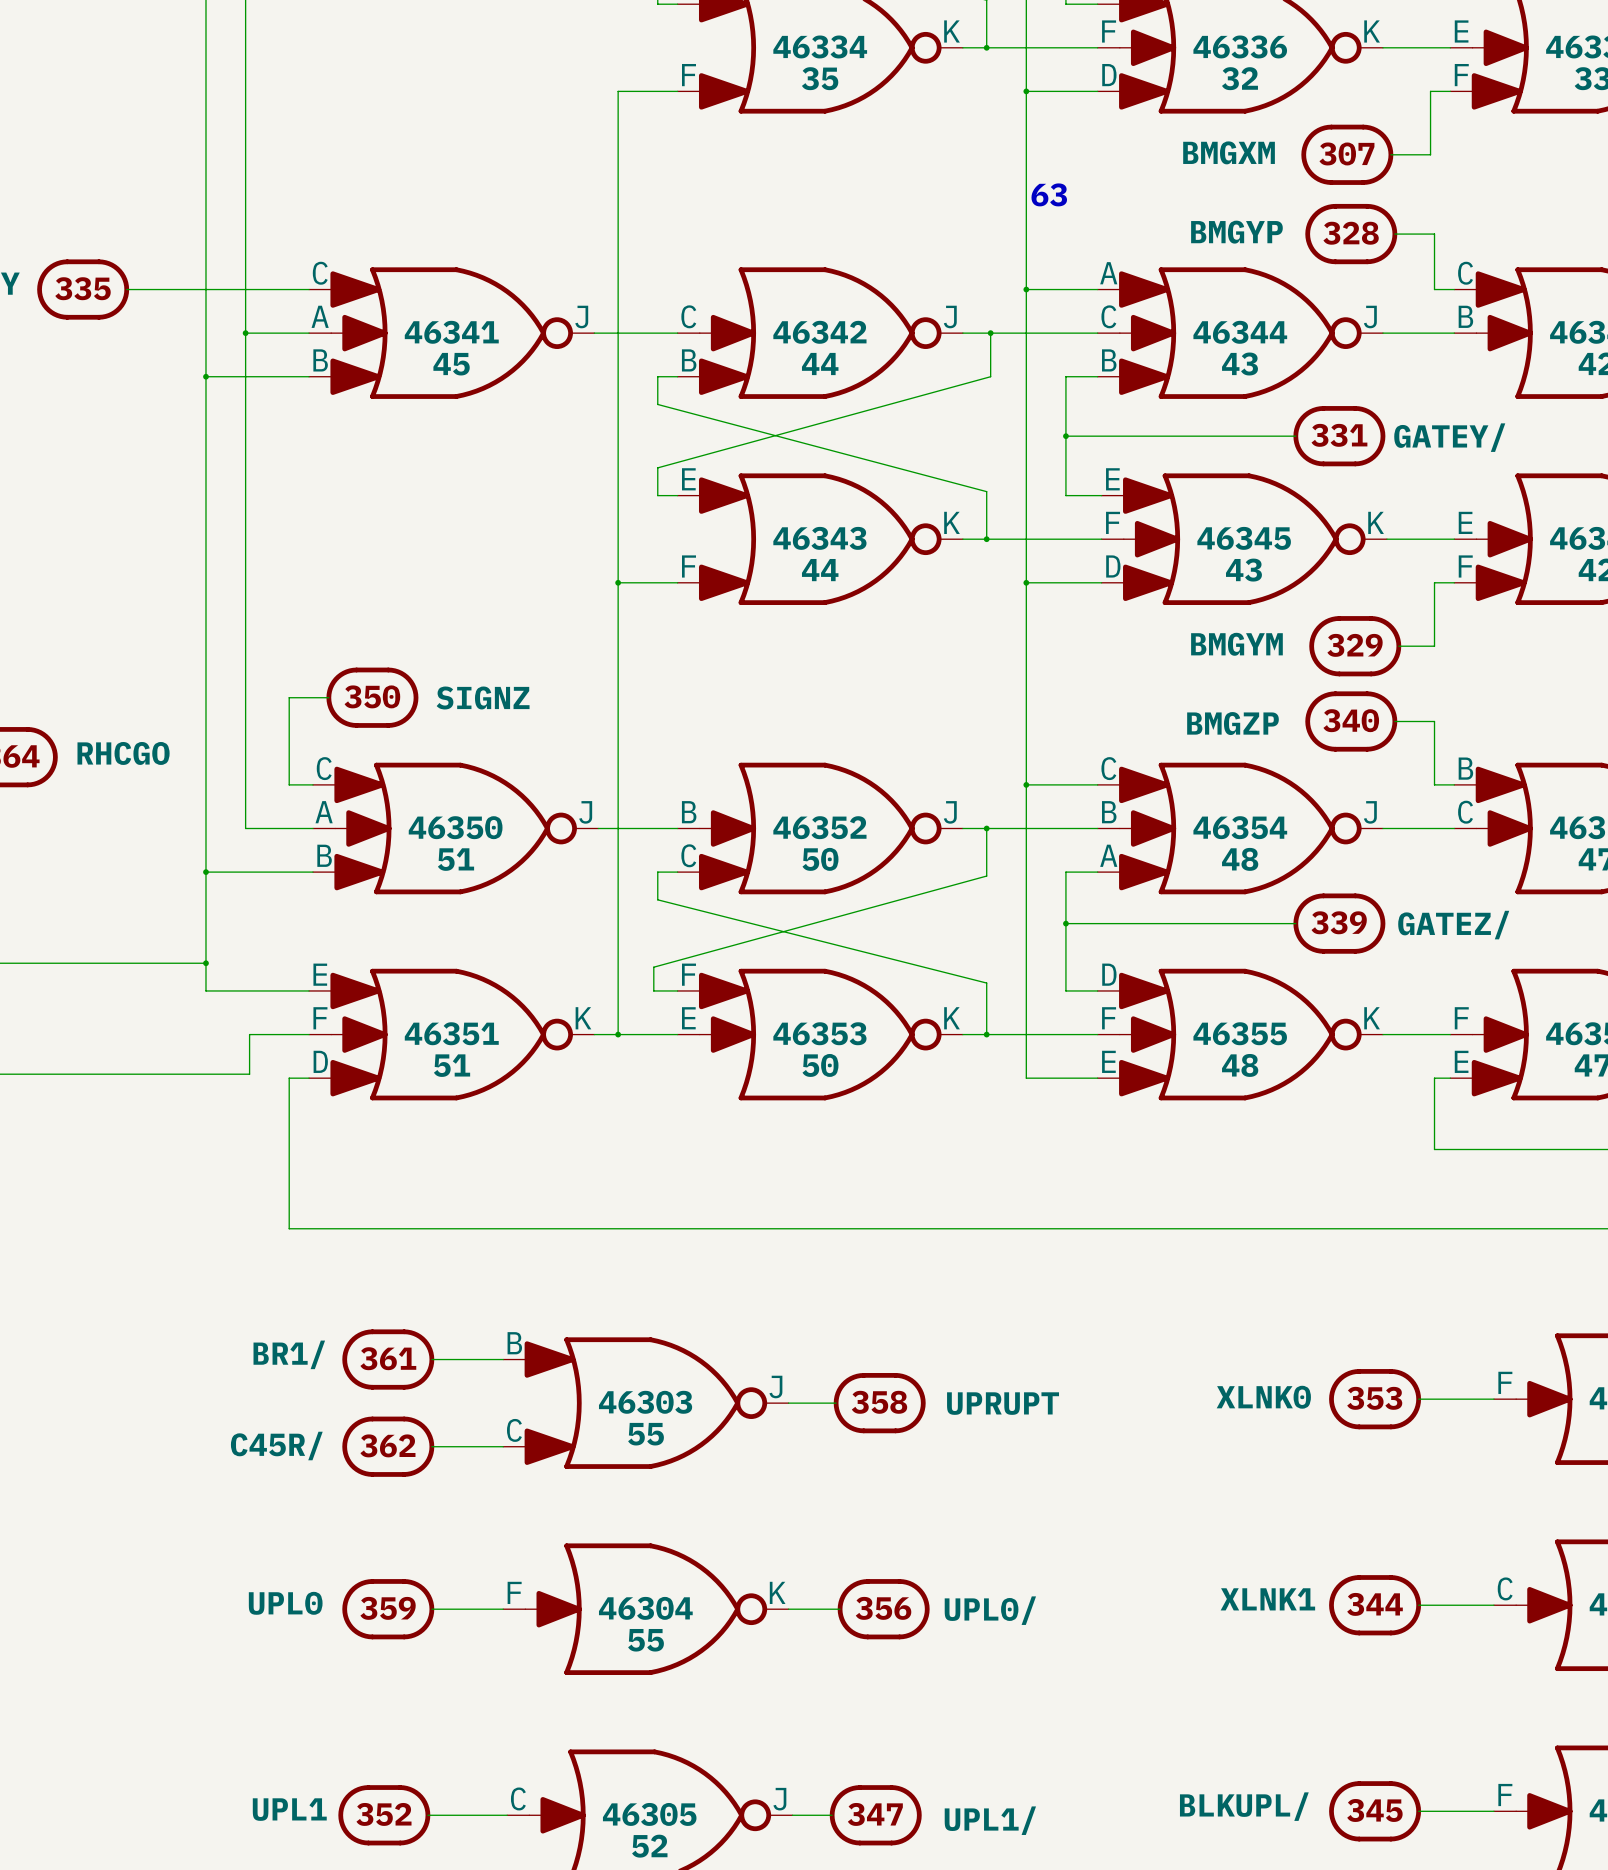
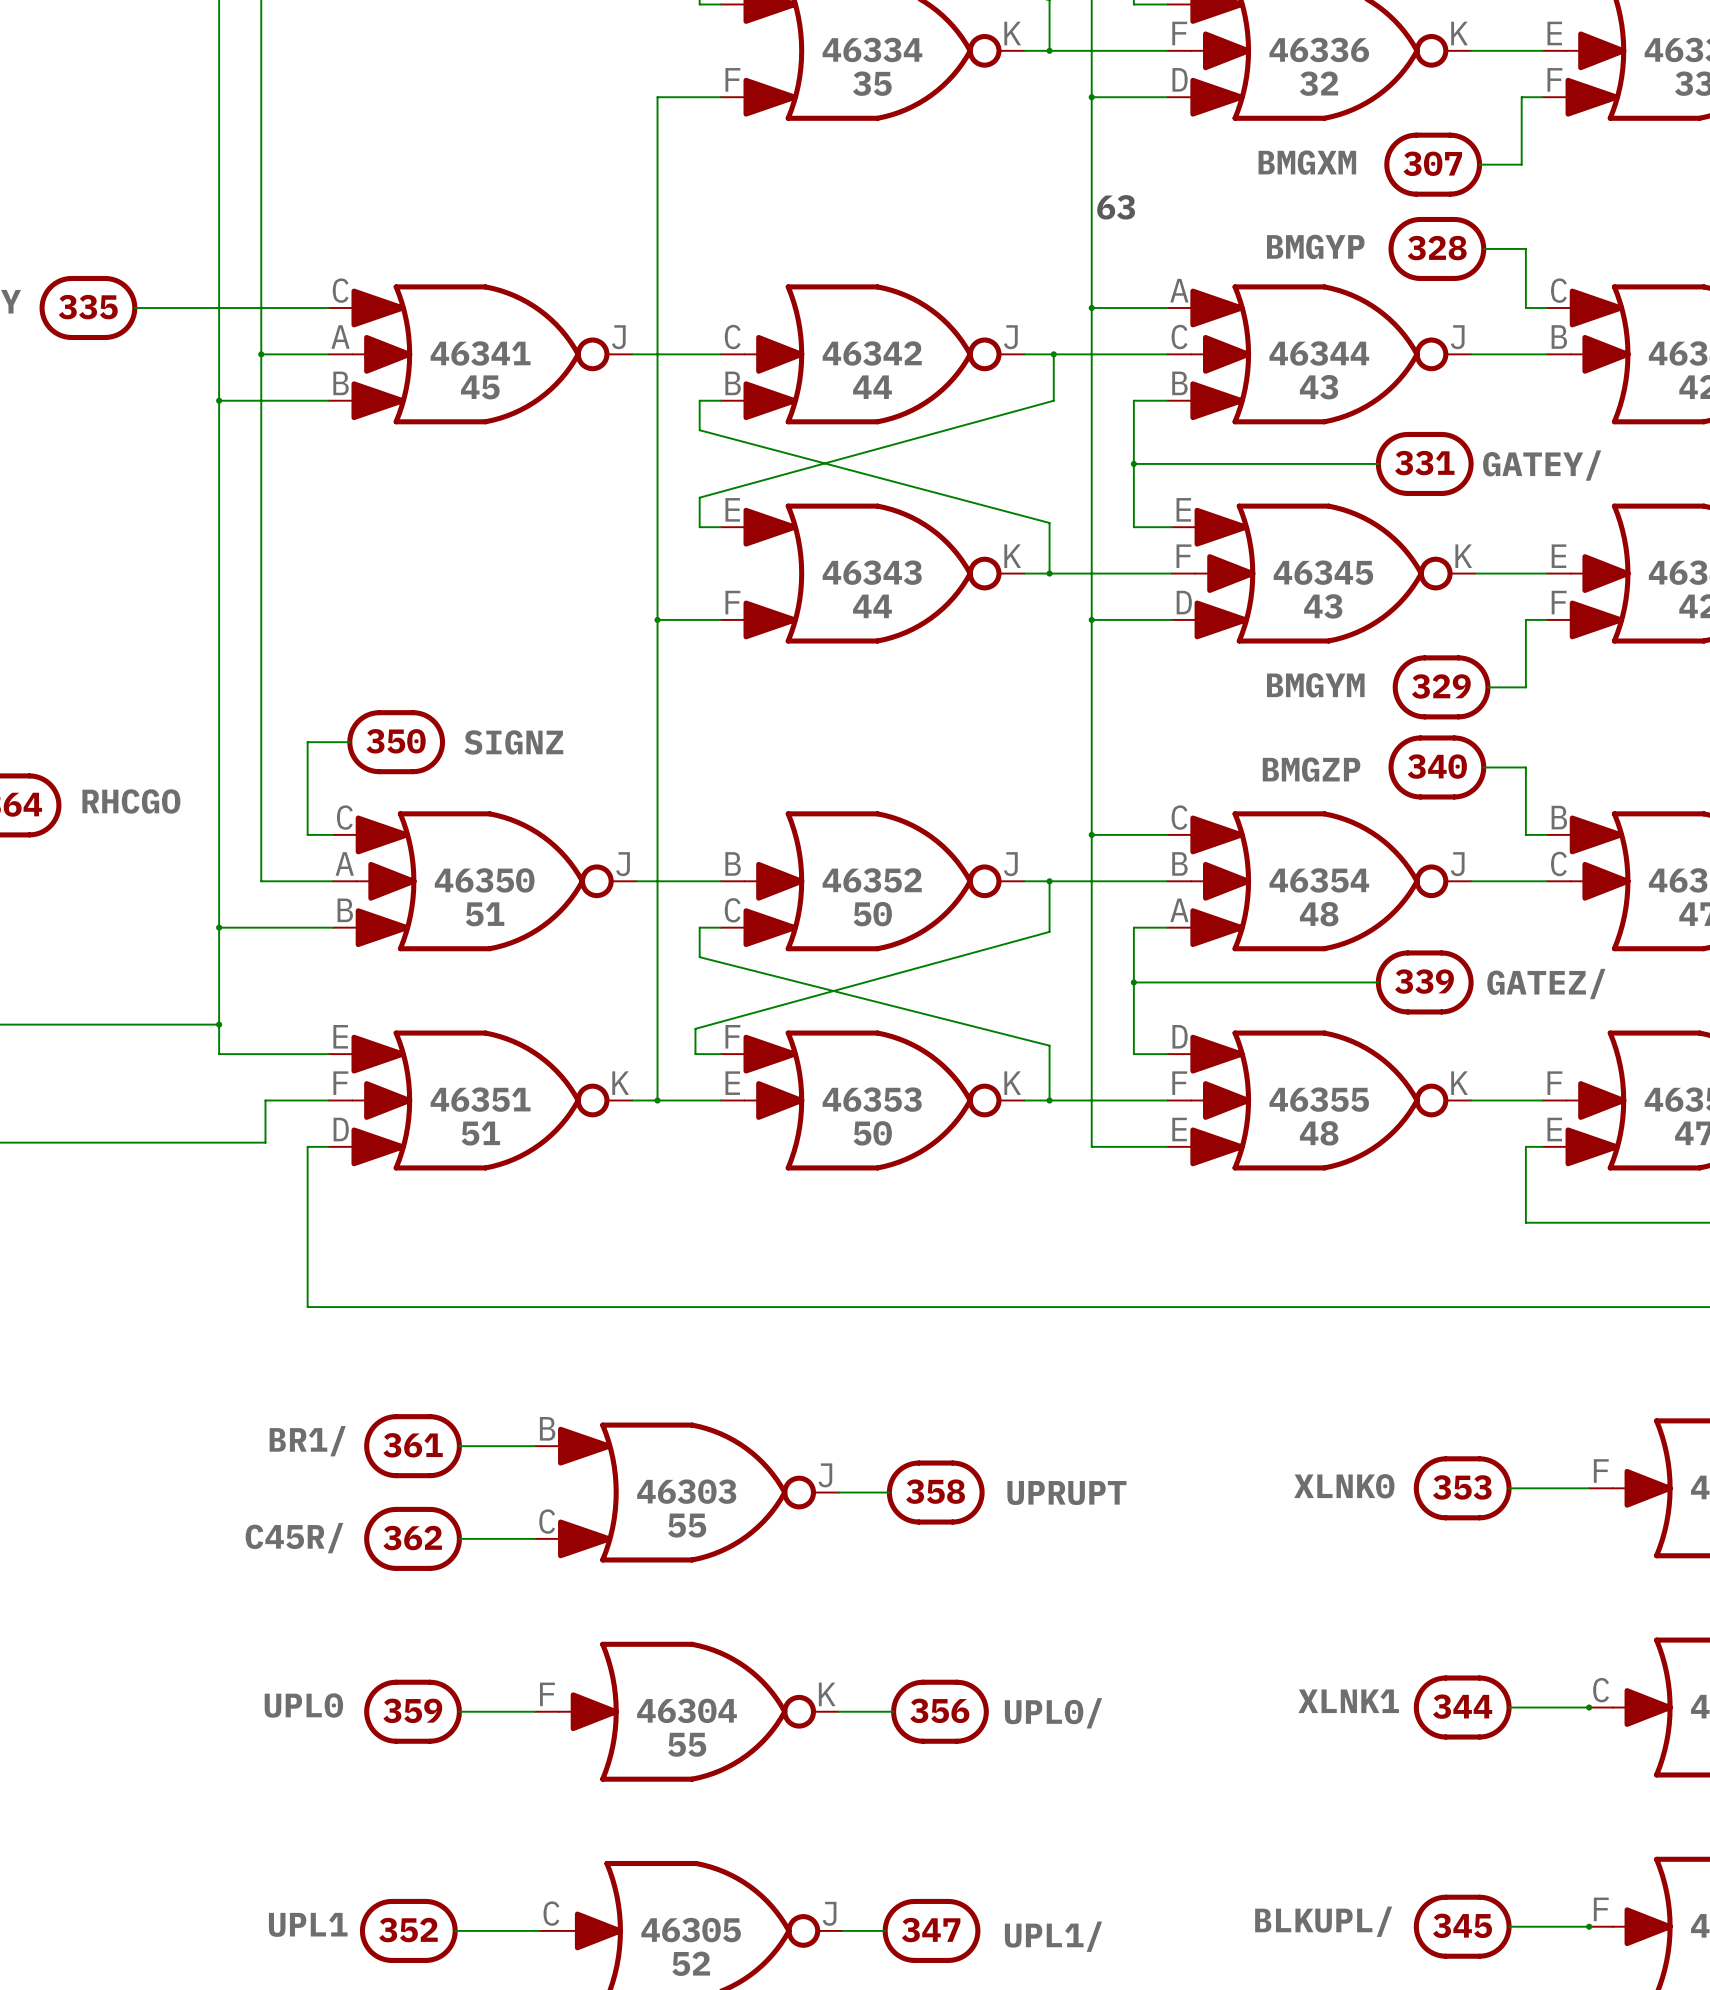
junction: none -> (1589, 1707)
junction: none -> (1589, 1926)

